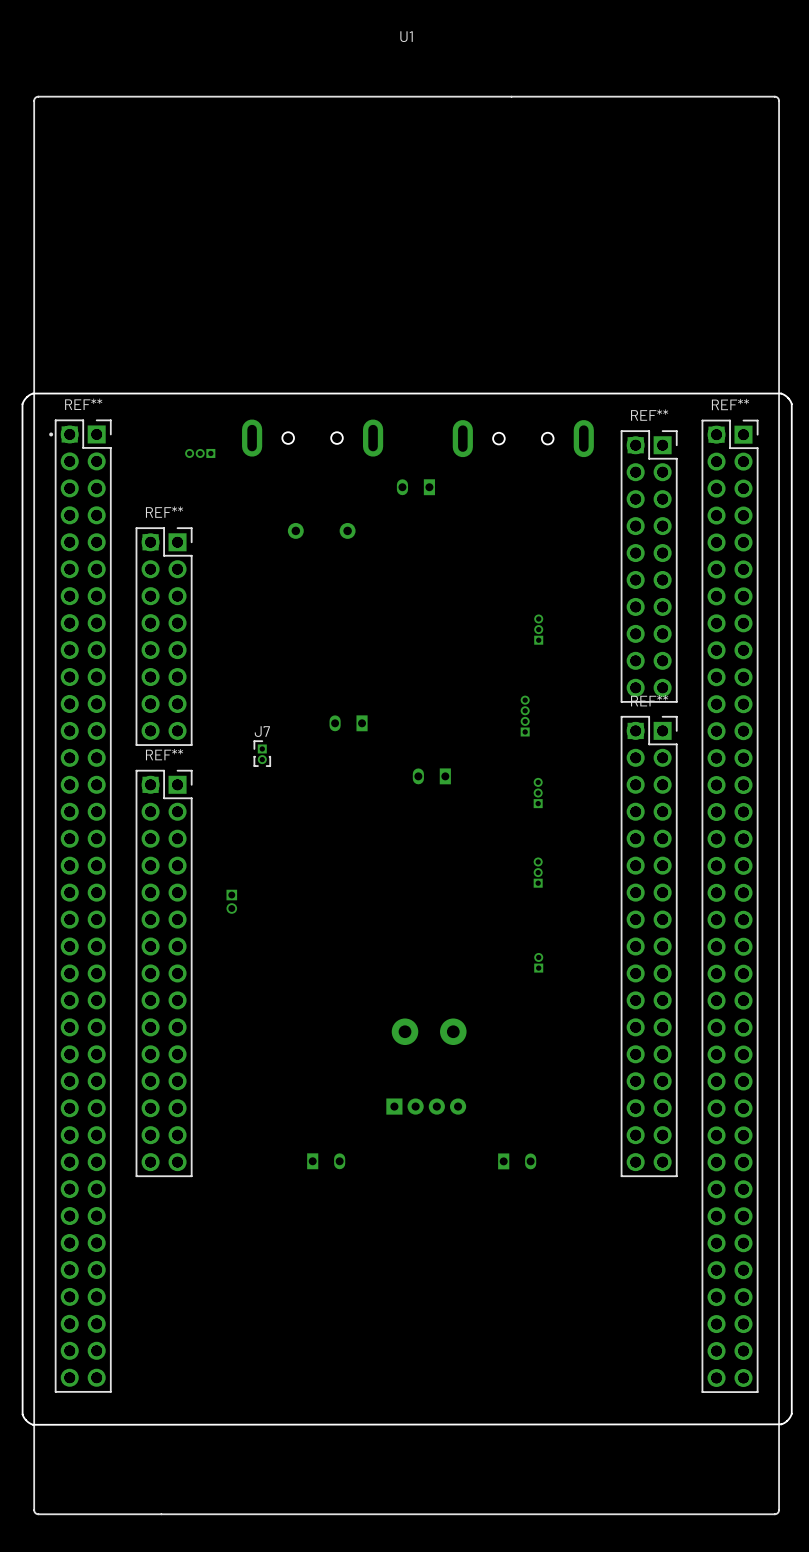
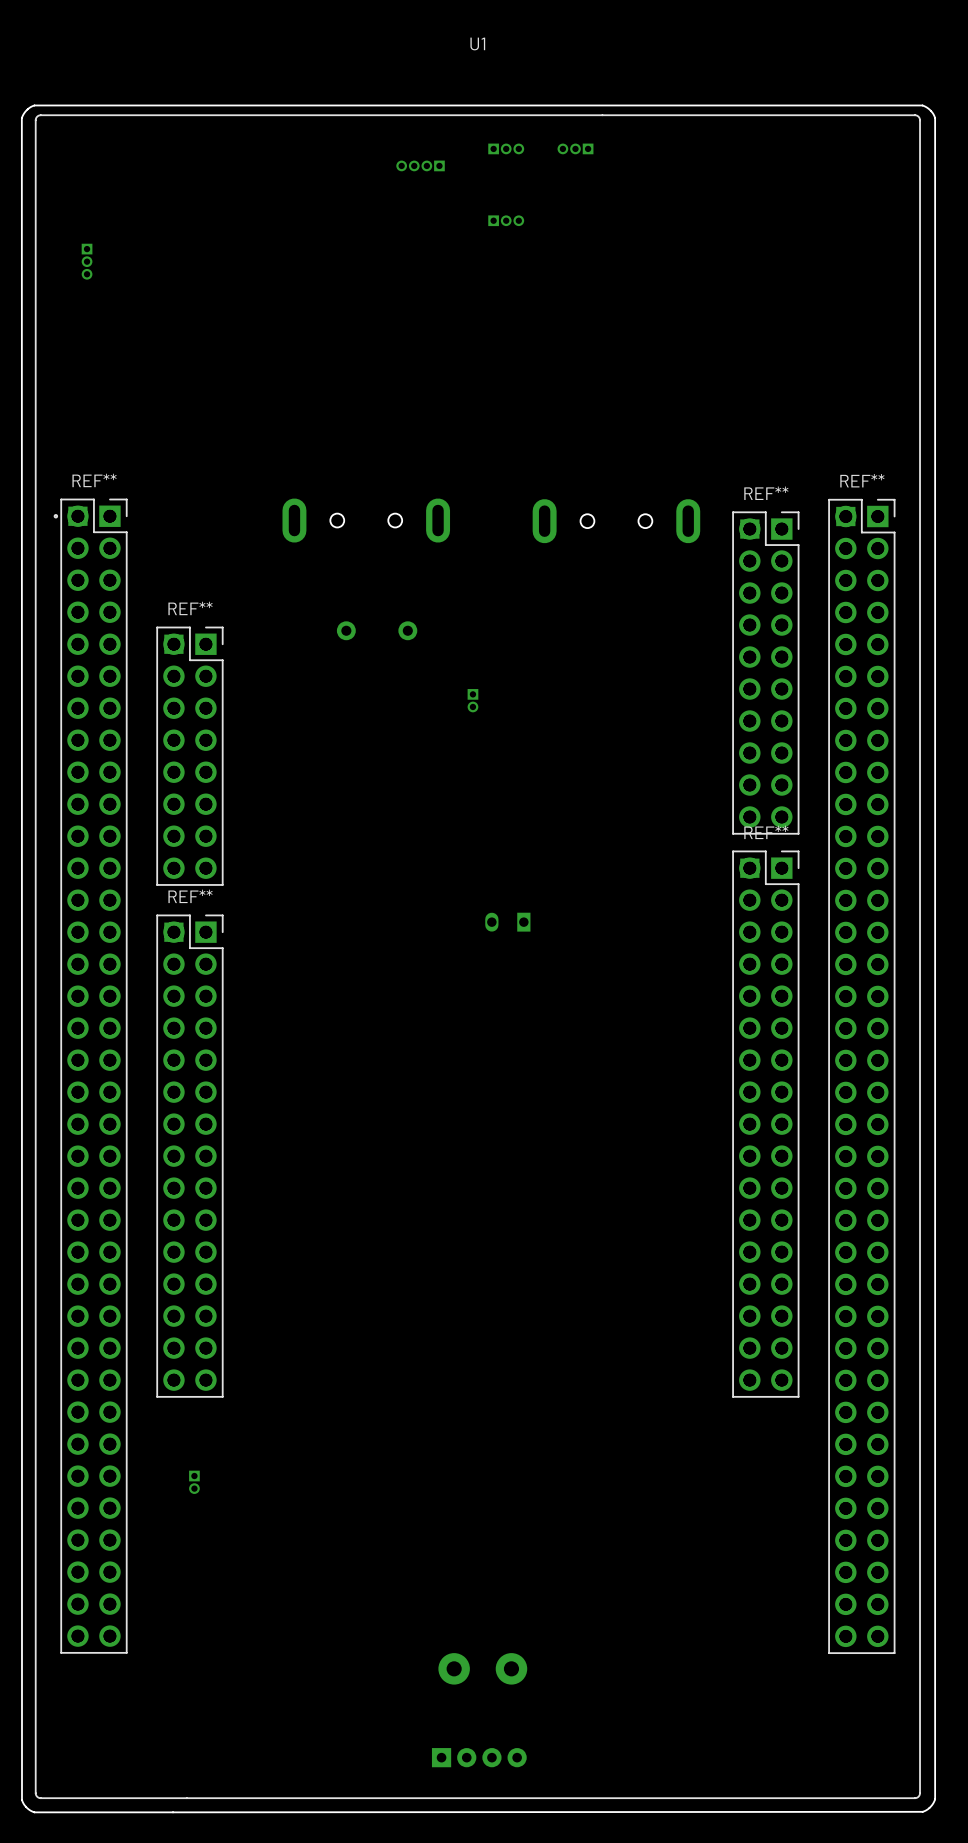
part: none -> (506, 148)
part: none -> (575, 148)
part: none -> (420, 165)
part: none -> (506, 220)
part: none -> (87, 261)
board edge: (791, 404) (787, 397) (781, 393) (33, 393) (26, 397) (22, 404) (22, 1414) (24, 1418) (33, 1424) (781, 1424) (788, 1420) (791, 1413) -> (935, 480) (935, 118) (931, 111) (924, 106) (34, 105) (27, 109) (22, 116) (21, 1799) (23, 1803) (34, 1812) (922, 1811) (930, 1806) (935, 1799) (935, 1678)
part: (200, 453) -> none
part: (415, 487) -> none
part: none -> (472, 700)
part: (538, 629) -> none
part: (525, 716) -> none
part: (348, 723) -> none
J7: (262, 753) -> none
part: (538, 793) -> none
part: (538, 872) -> none
part: (231, 901) -> none
part: (538, 962) -> none
part: (405, 1031) -> none
part: (453, 1031) -> none
part: (426, 1106) -> none
part: (326, 1161) -> none
part: (517, 1161) -> none
part: none -> (194, 1482)
part: none -> (454, 1668)
part: none -> (511, 1668)
part: none -> (479, 1757)

